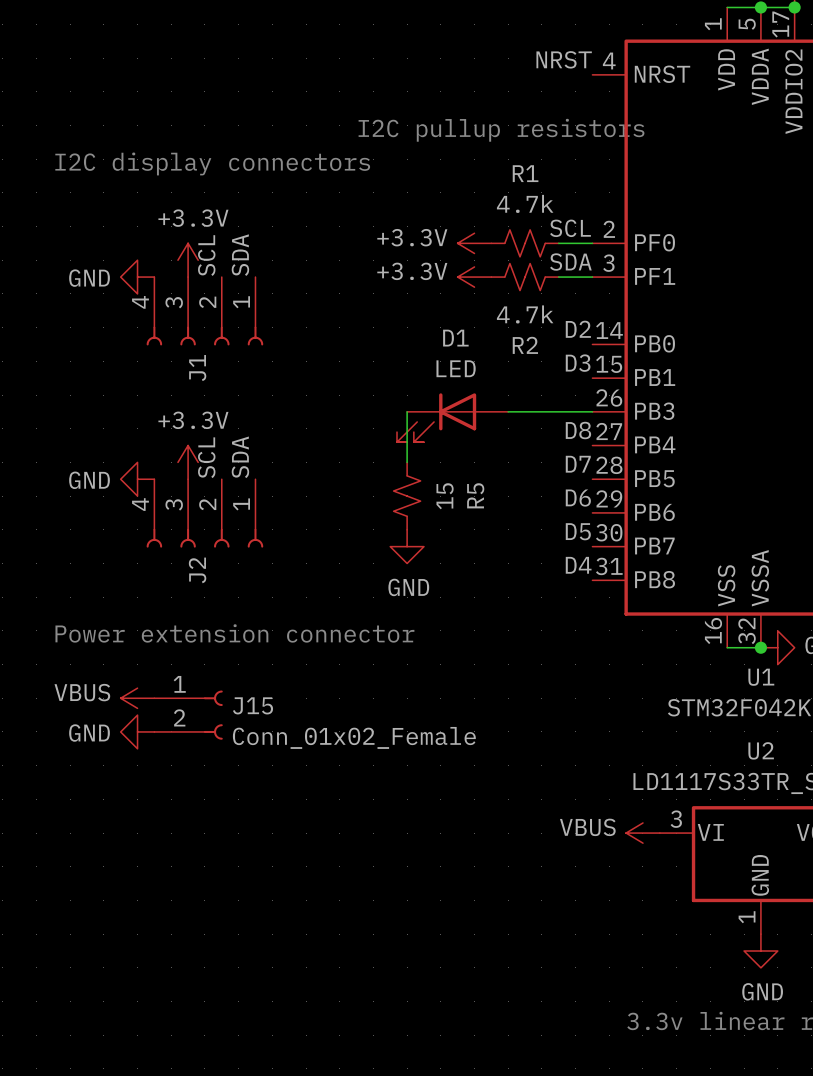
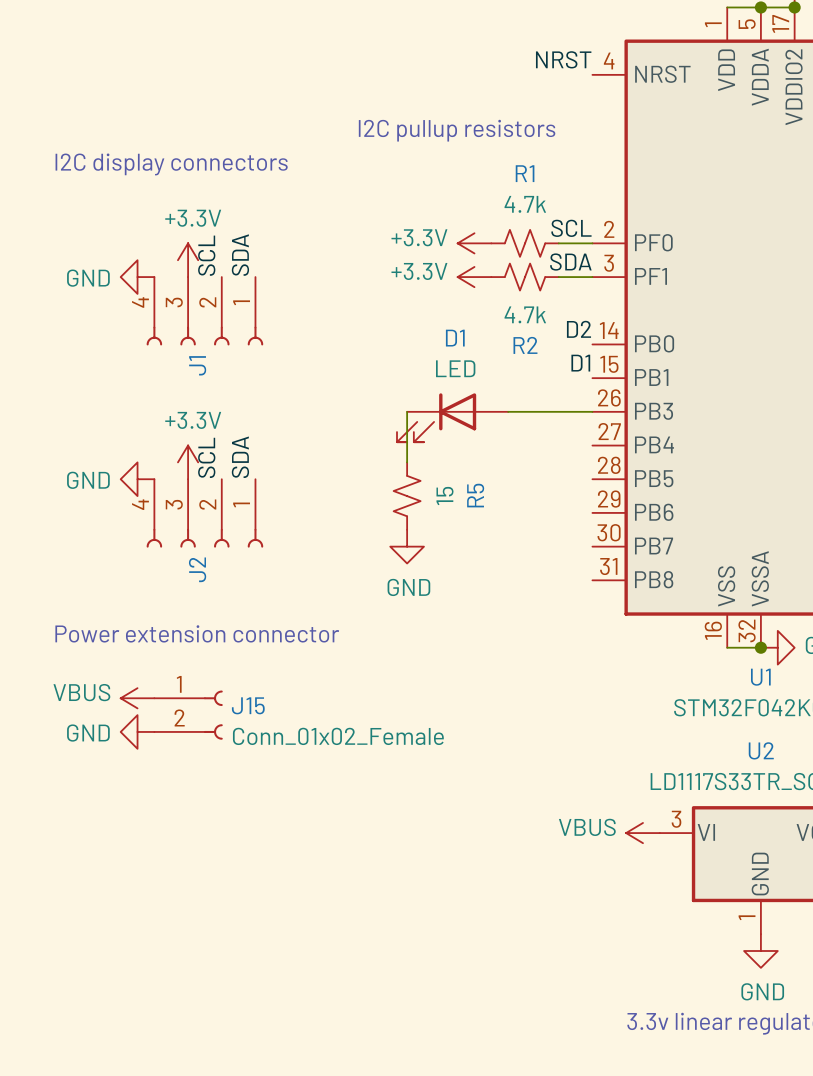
label: D3 (578, 363) -> D1 (580, 363)
label: D8 (578, 430) -> none
label: D7 (578, 464) -> none
label: D6 (578, 498) -> none
label: D5 (578, 531) -> none
label: D4 (578, 565) -> none

